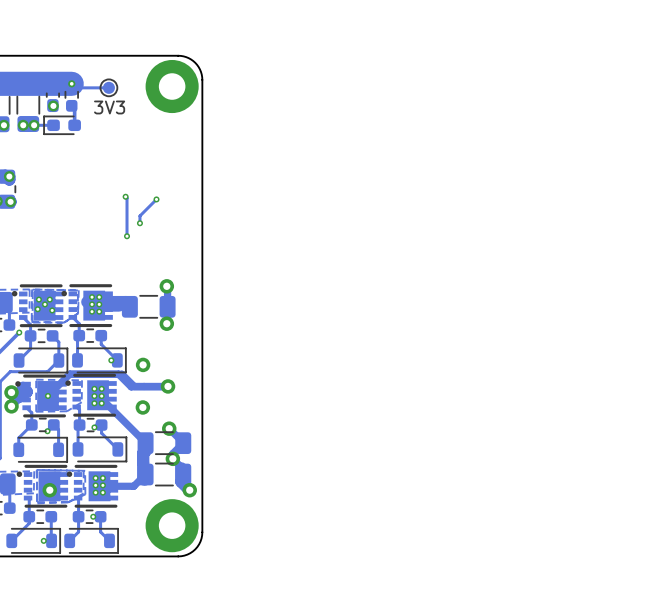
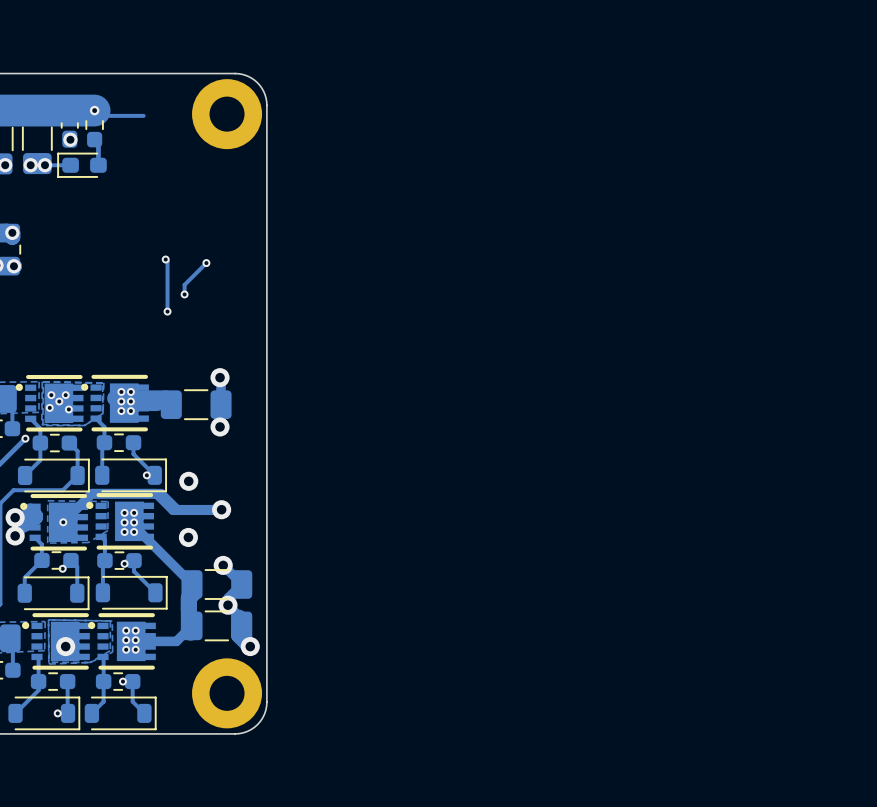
part: (108, 87) -> none
text: 3V3 (109, 107) -> none

